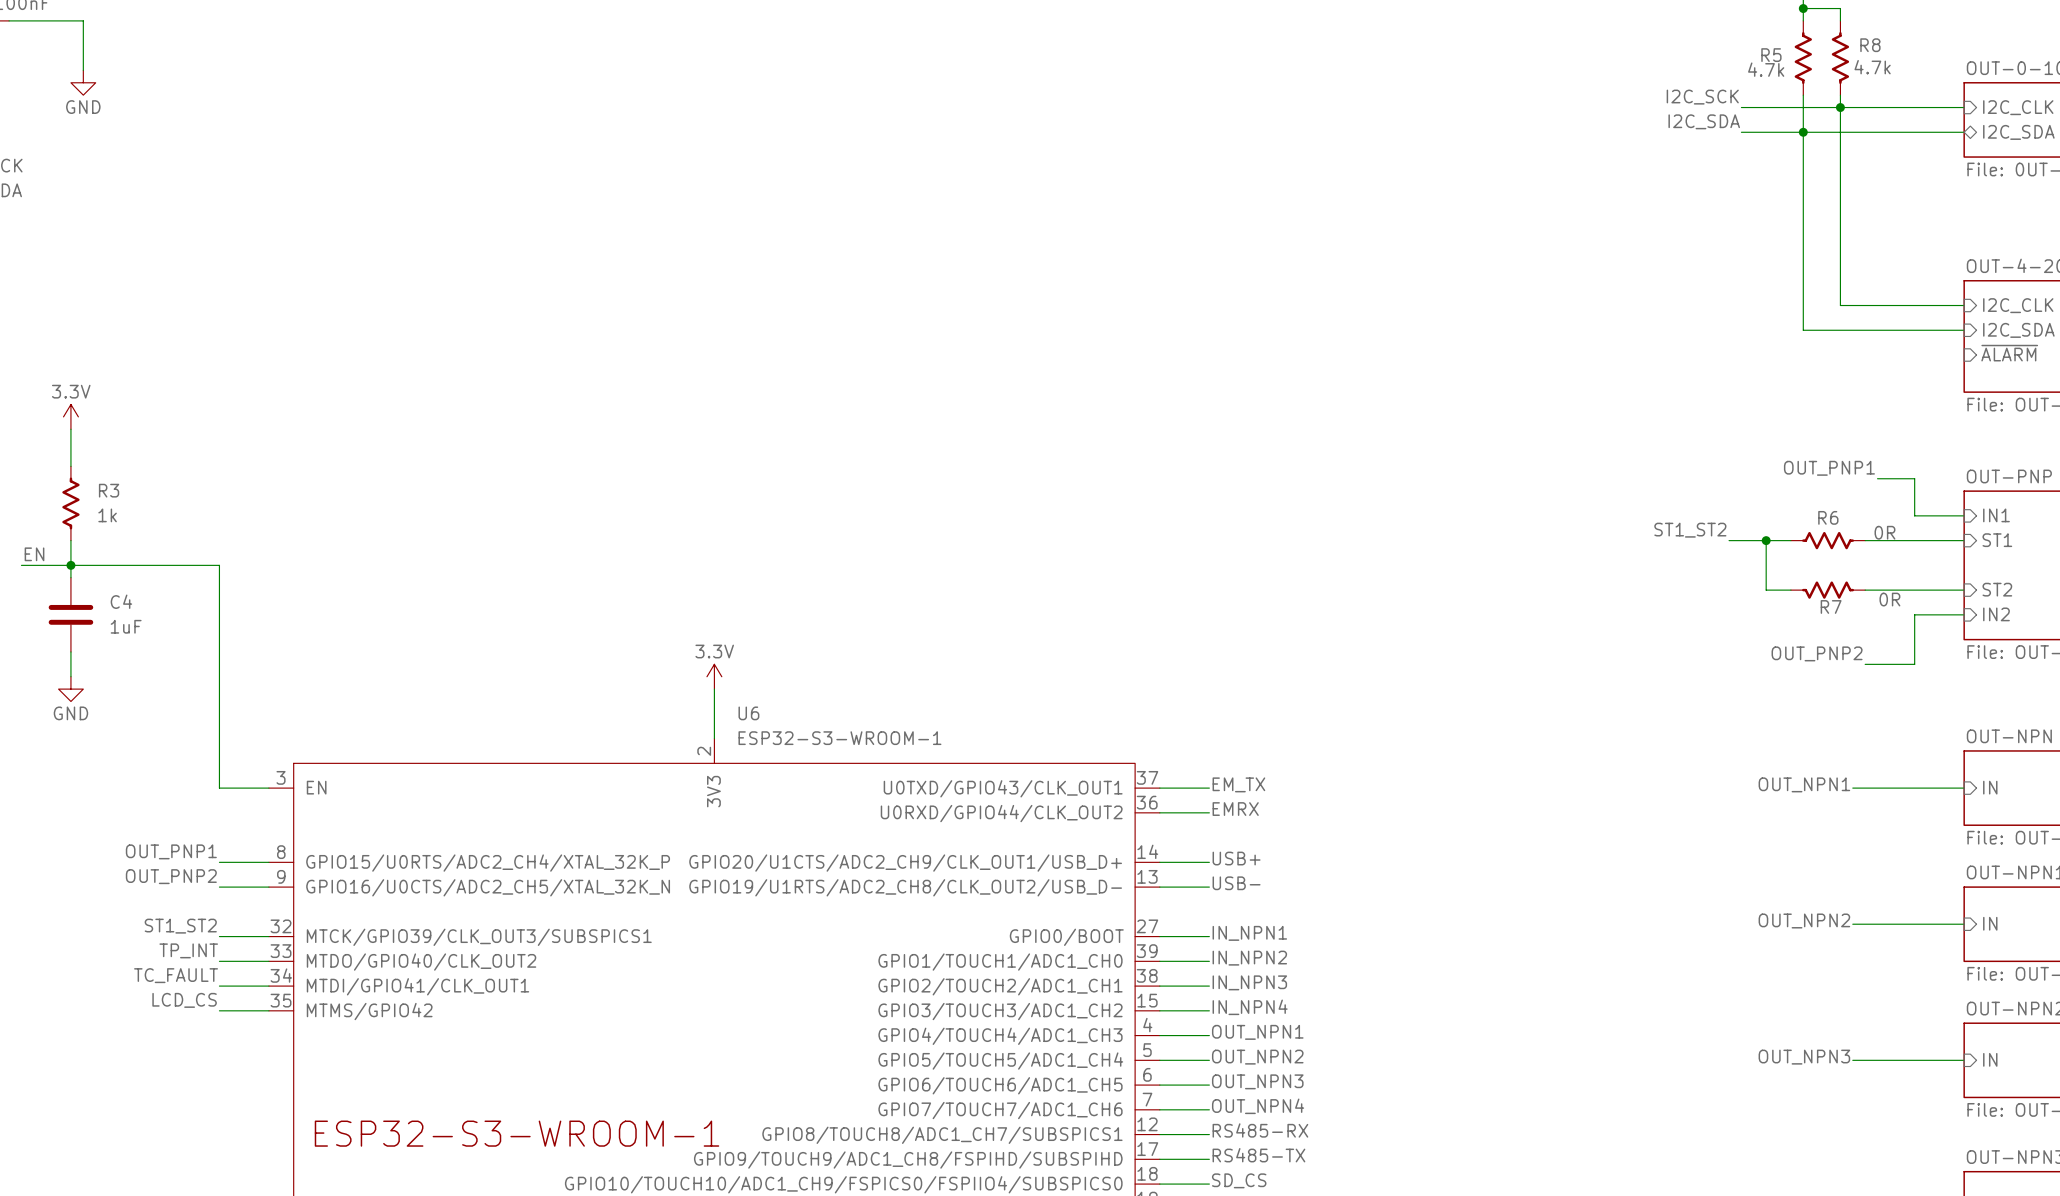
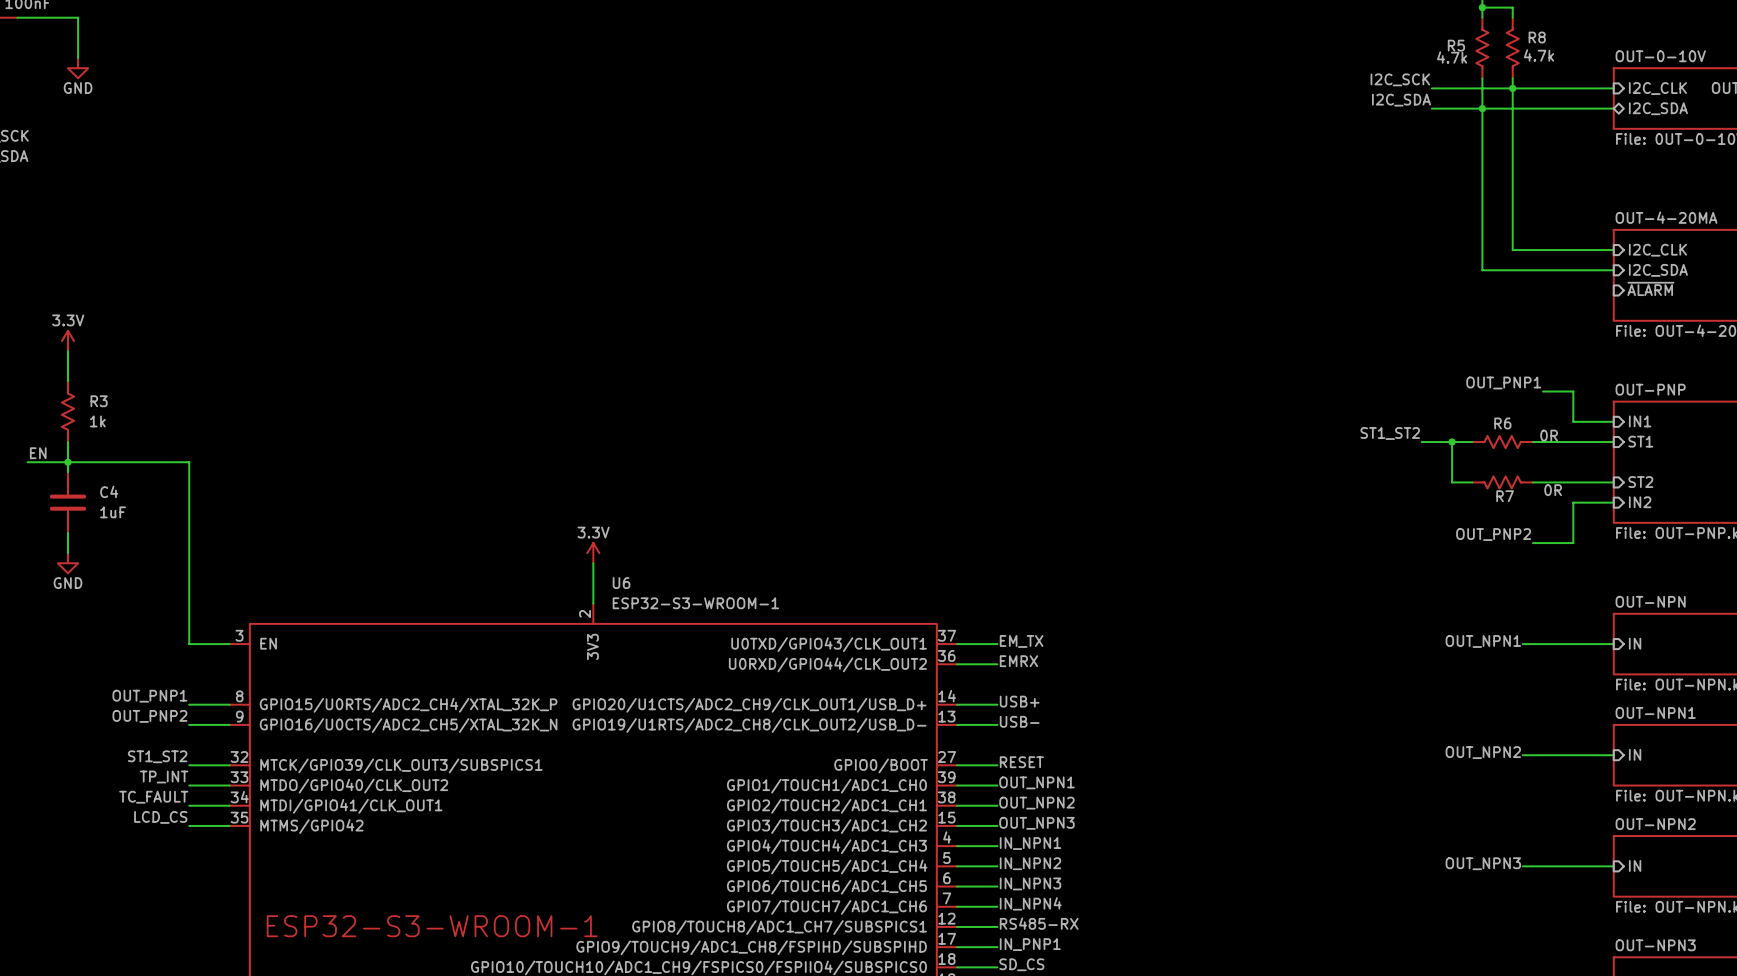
label: IN_NPN1 (1249, 933) -> RESET (1021, 762)
label: IN_NPN2 (1249, 958) -> OUT_NPN1 (1036, 782)
label: IN_NPN3 (1249, 982) -> OUT_NPN2 (1036, 803)
label: IN_NPN4 (1250, 1007) -> OUT_NPN3 (1036, 823)
label: OUT_NPN1 (1257, 1032) -> IN_NPN1 (1030, 843)
label: OUT_NPN2 (1257, 1057) -> IN_NPN2 (1030, 863)
label: OUT_NPN3 (1257, 1081) -> IN_NPN3 (1030, 883)
label: OUT_NPN4 (1258, 1106) -> IN_NPN4 (1030, 903)
label: RS485-TX (1258, 1155) -> IN_PNP1 (1030, 944)

